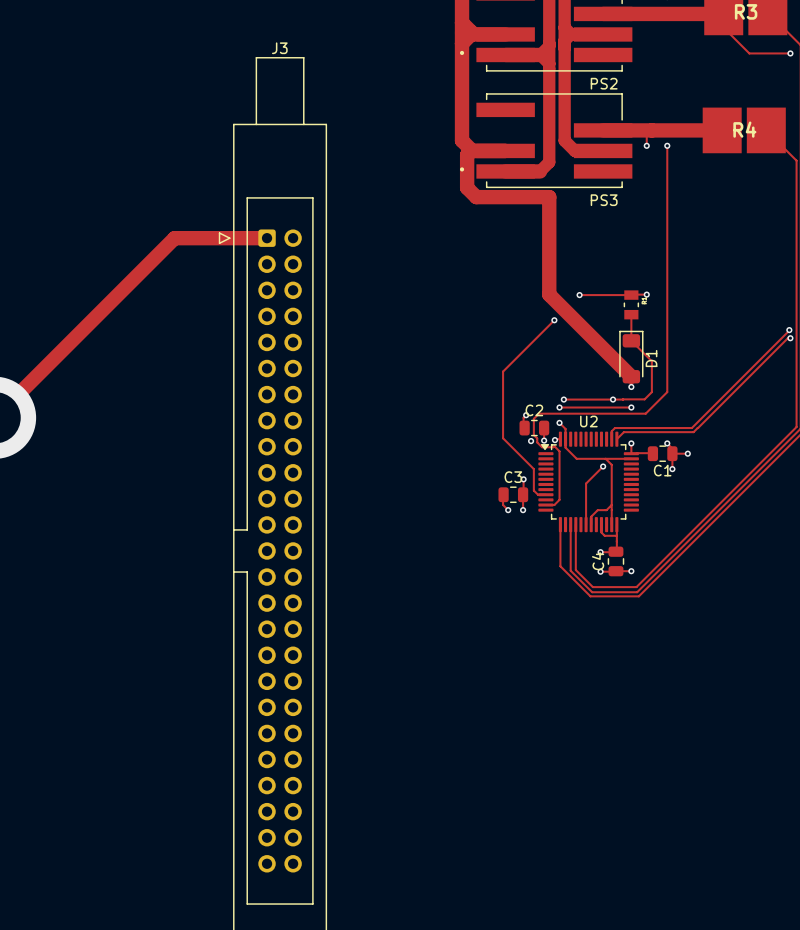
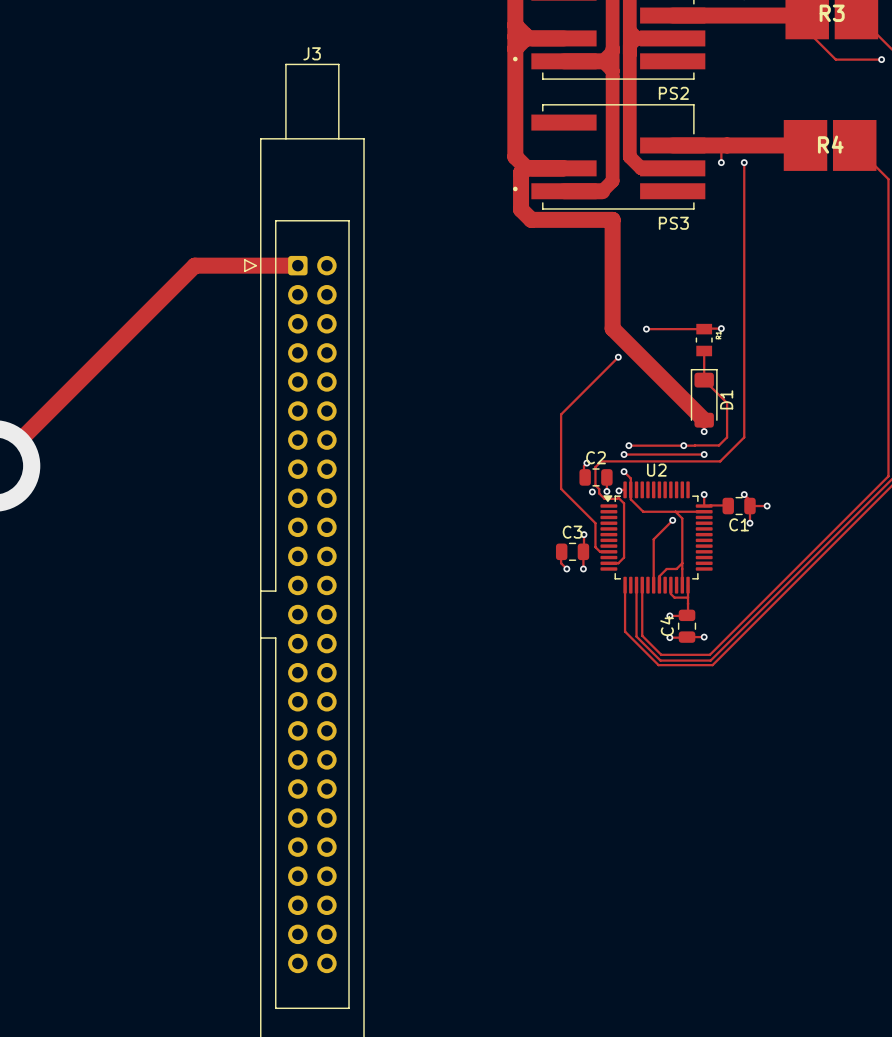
via: (789, 330) -> none
track: (790, 330) (691, 428) (614, 428) (611, 431) (611, 439) -> none
track: (790, 338) (787, 338) (693, 432) (623, 432) (616, 439) -> none
via: (790, 338) -> none

